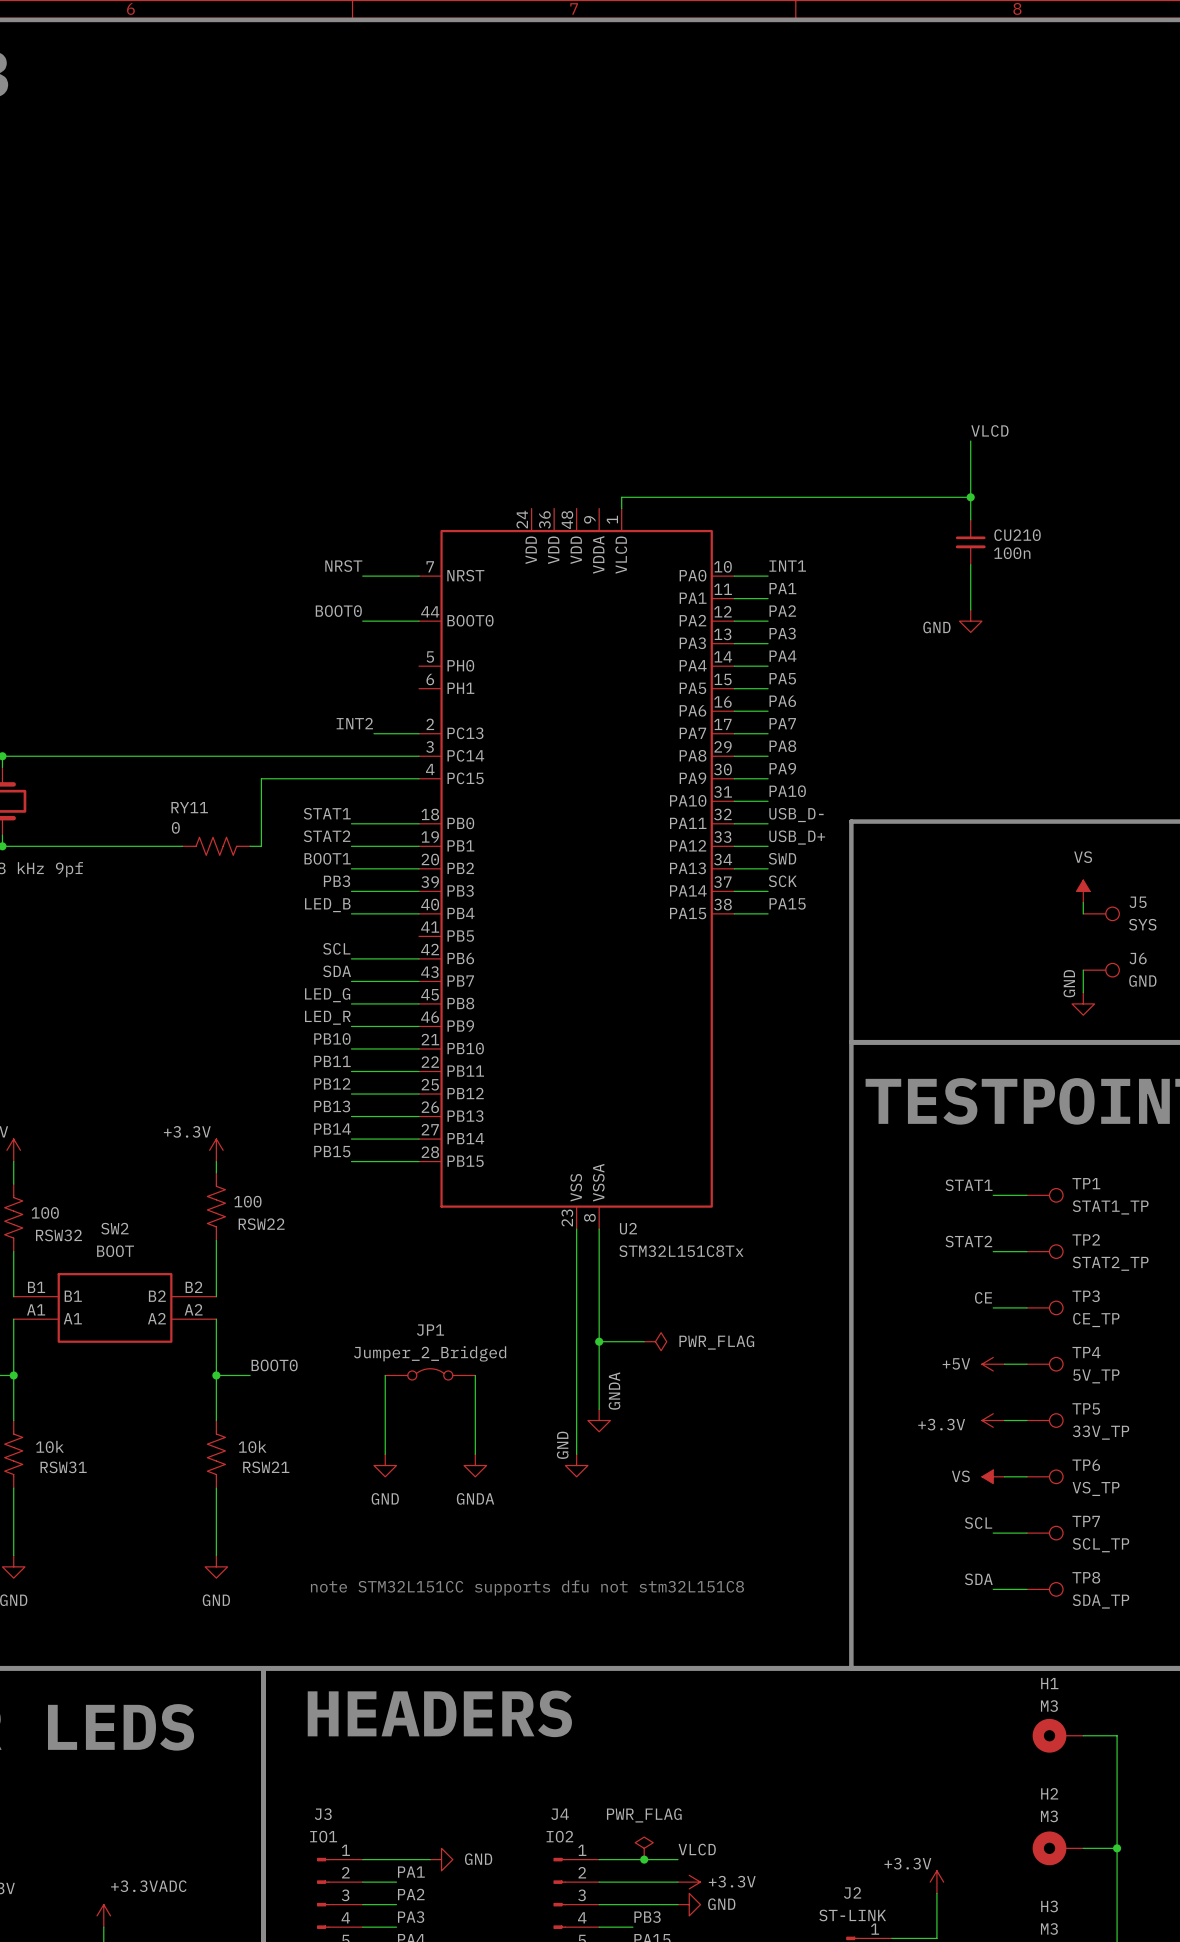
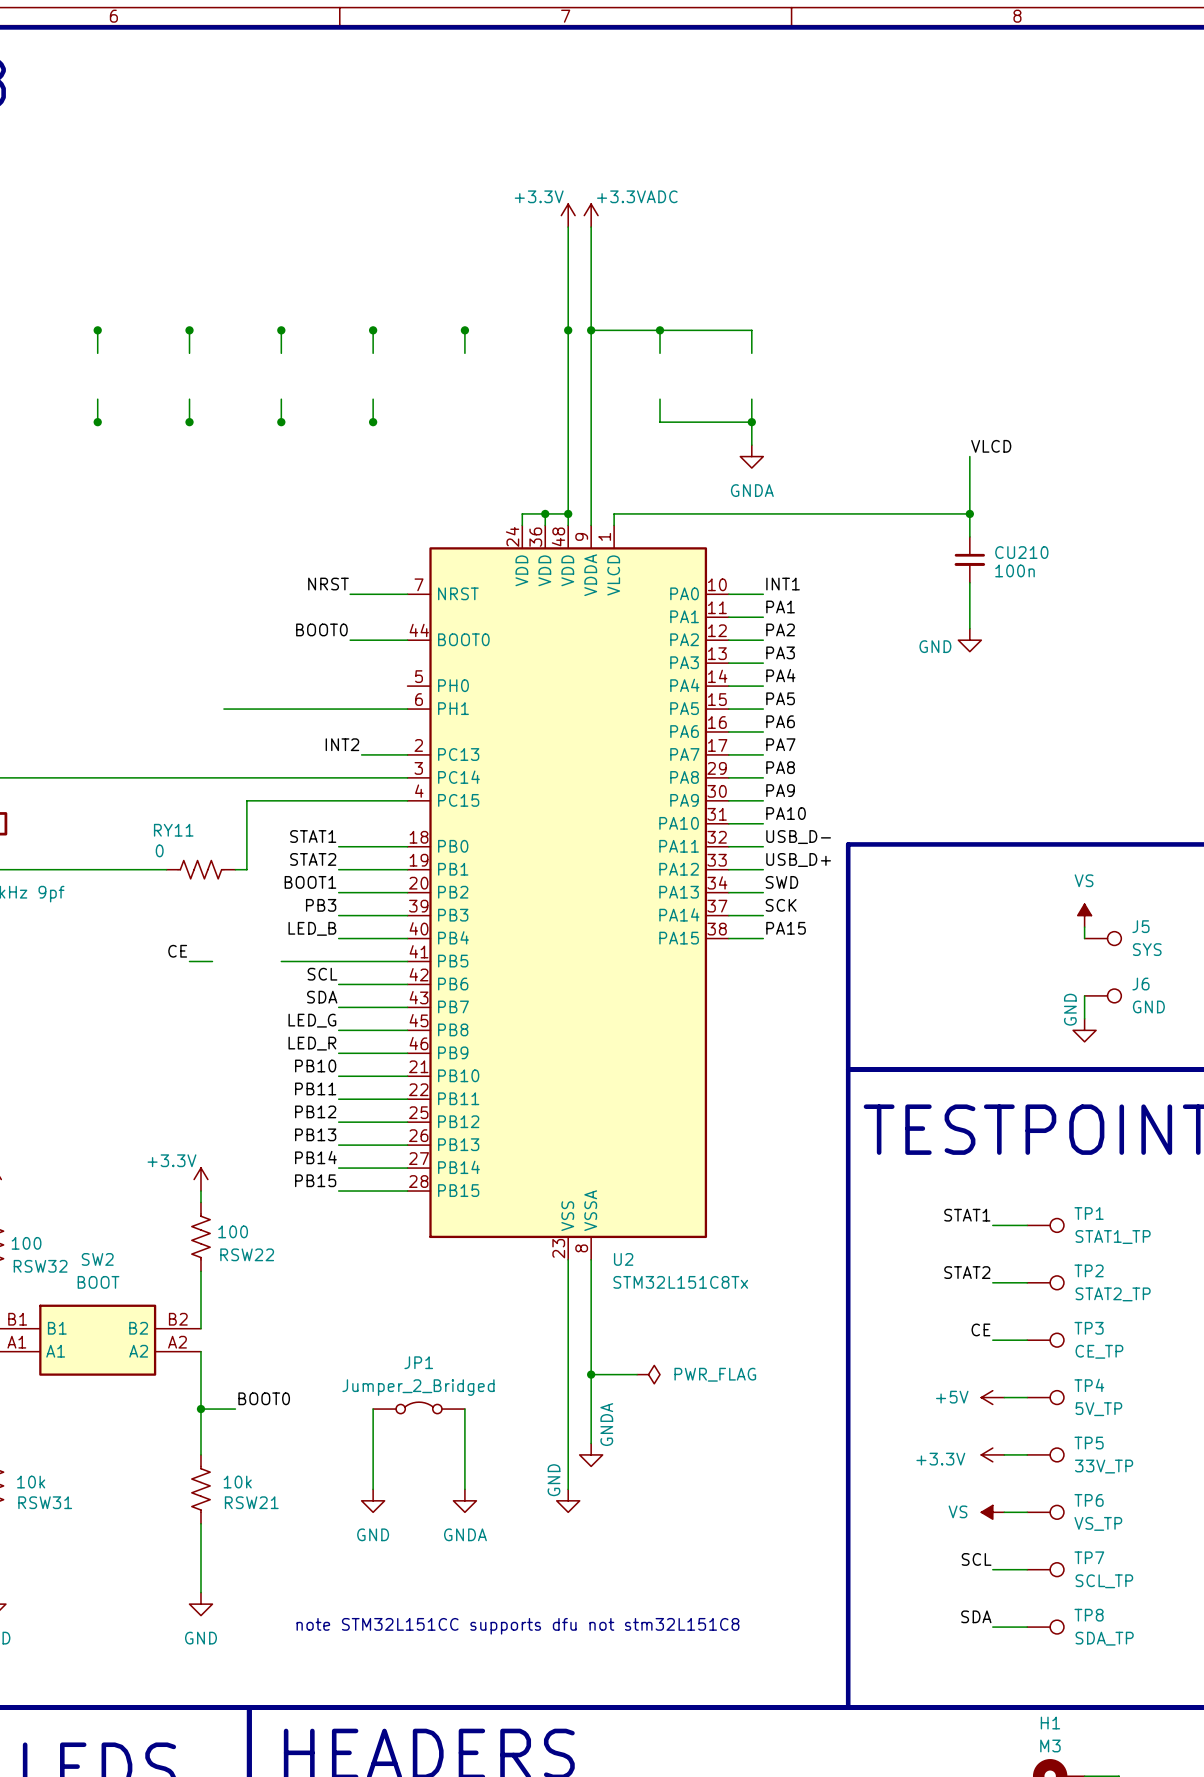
power symbol: none -> +3.3V (568, 215)
power symbol: none -> +3.3VADC (591, 215)
wire: none -> (568, 227) (568, 525)
wire: none -> (591, 227) (591, 525)
wire: none -> (97, 330) (97, 353)
junction: none -> (97, 330)
wire: none -> (189, 330) (189, 353)
junction: none -> (189, 330)
wire: none -> (281, 330) (281, 353)
junction: none -> (281, 330)
wire: none -> (373, 330) (373, 353)
junction: none -> (373, 330)
wire: none -> (464, 330) (464, 353)
junction: none -> (464, 330)
junction: none -> (568, 330)
wire: none -> (591, 330) (751, 330) (751, 353)
junction: none -> (591, 330)
wire: none -> (660, 330) (660, 353)
junction: none -> (660, 330)
wire: none -> (97, 399) (97, 422)
wire: none -> (189, 399) (189, 422)
wire: none -> (281, 399) (281, 422)
wire: none -> (373, 399) (373, 422)
wire: none -> (660, 399) (660, 422) (751, 422)
wire: none -> (751, 399) (751, 445)
junction: none -> (97, 422)
junction: none -> (189, 422)
junction: none -> (281, 422)
junction: none -> (373, 422)
junction: none -> (751, 422)
power symbol: none -> GNDA (751, 456)
wire: none -> (545, 513) (545, 525)
junction: none -> (545, 513)
wire: none -> (568, 513) (522, 513) (522, 525)
junction: none -> (568, 513)
wire: none -> (223, 709) (407, 709)
label: none -> CE (177, 951)
wire: none -> (189, 961) (212, 961)
wire: none -> (281, 961) (407, 961)

